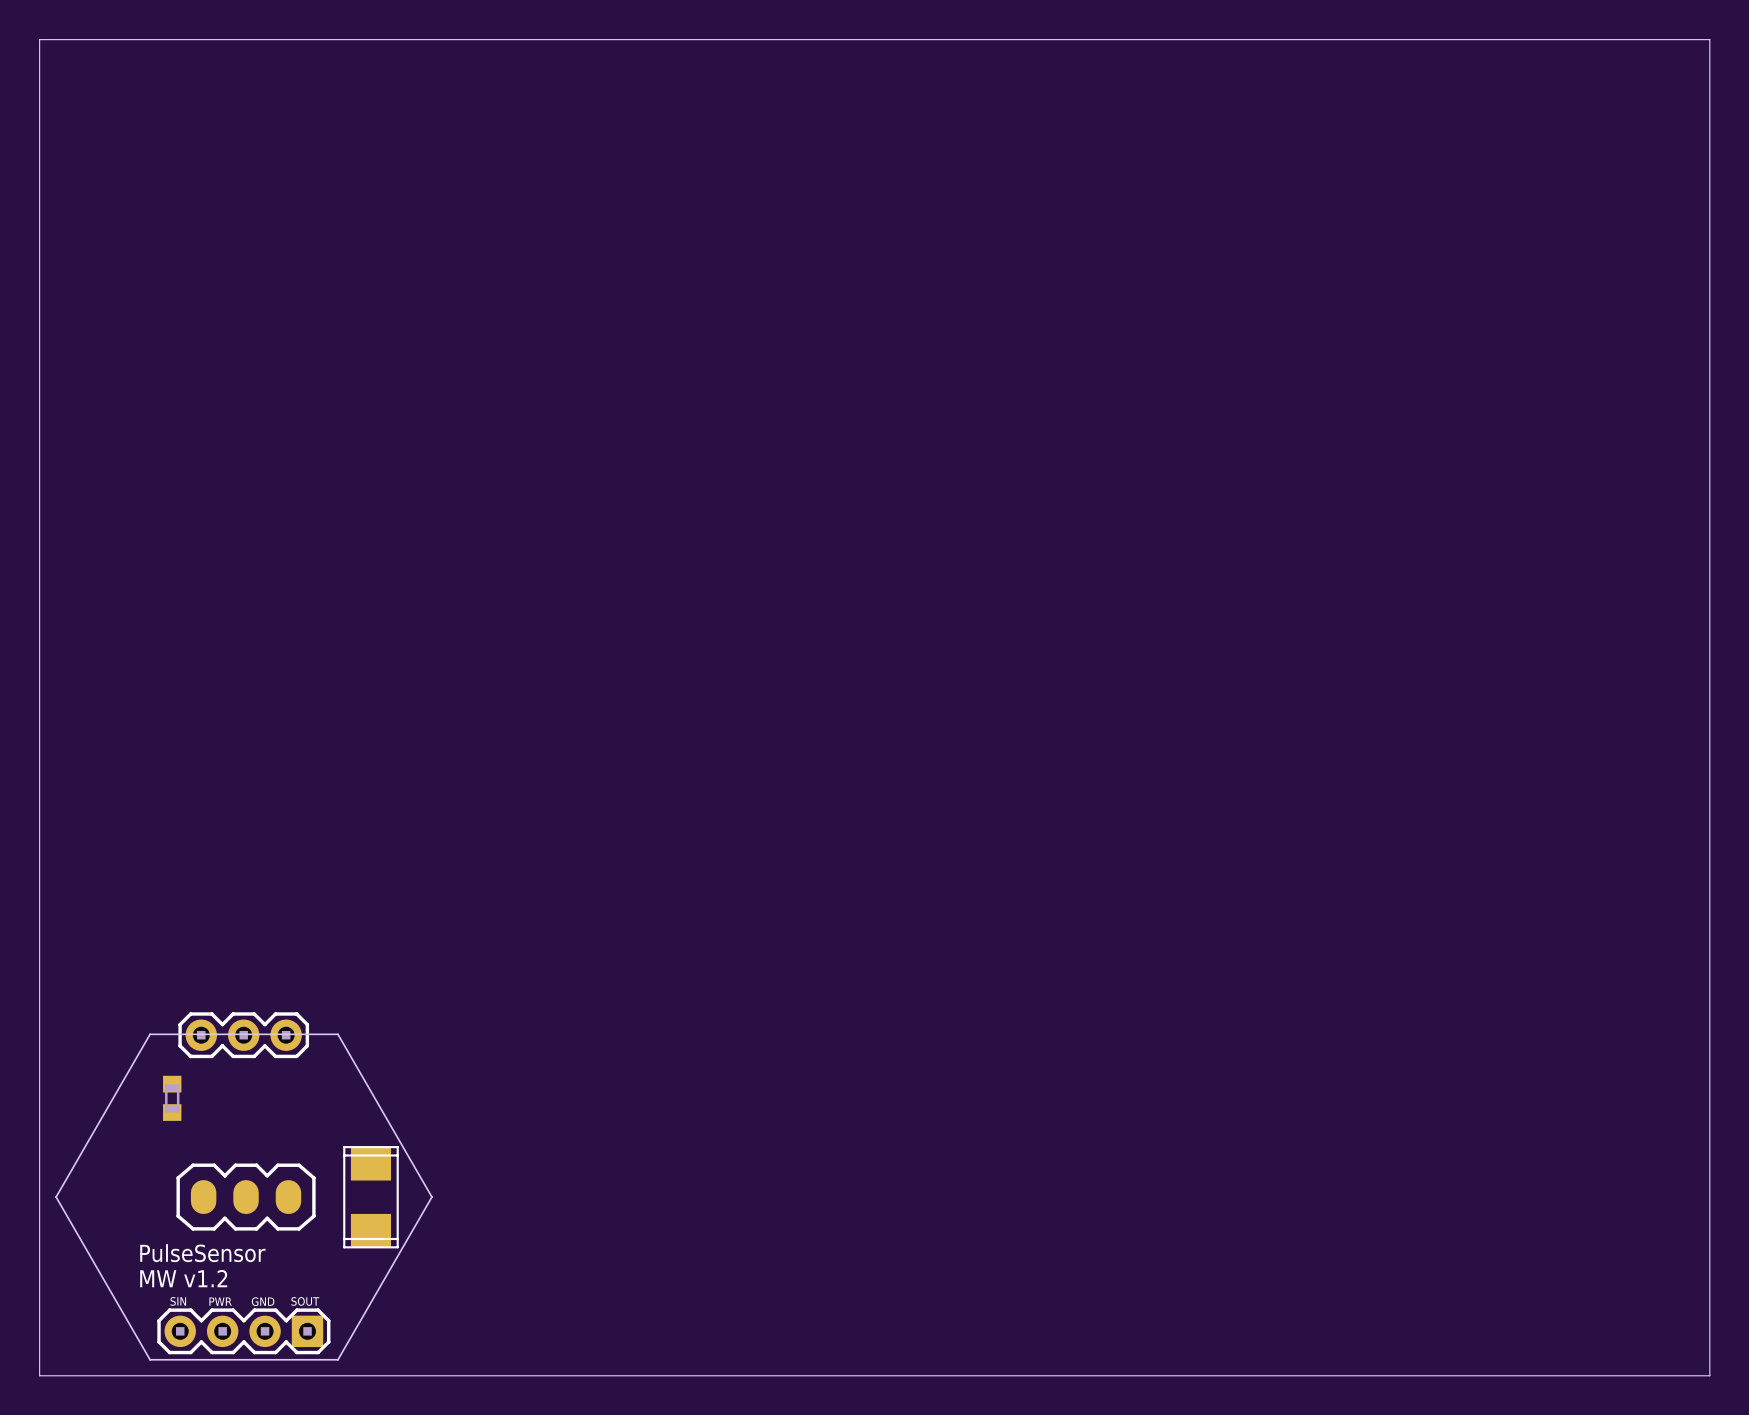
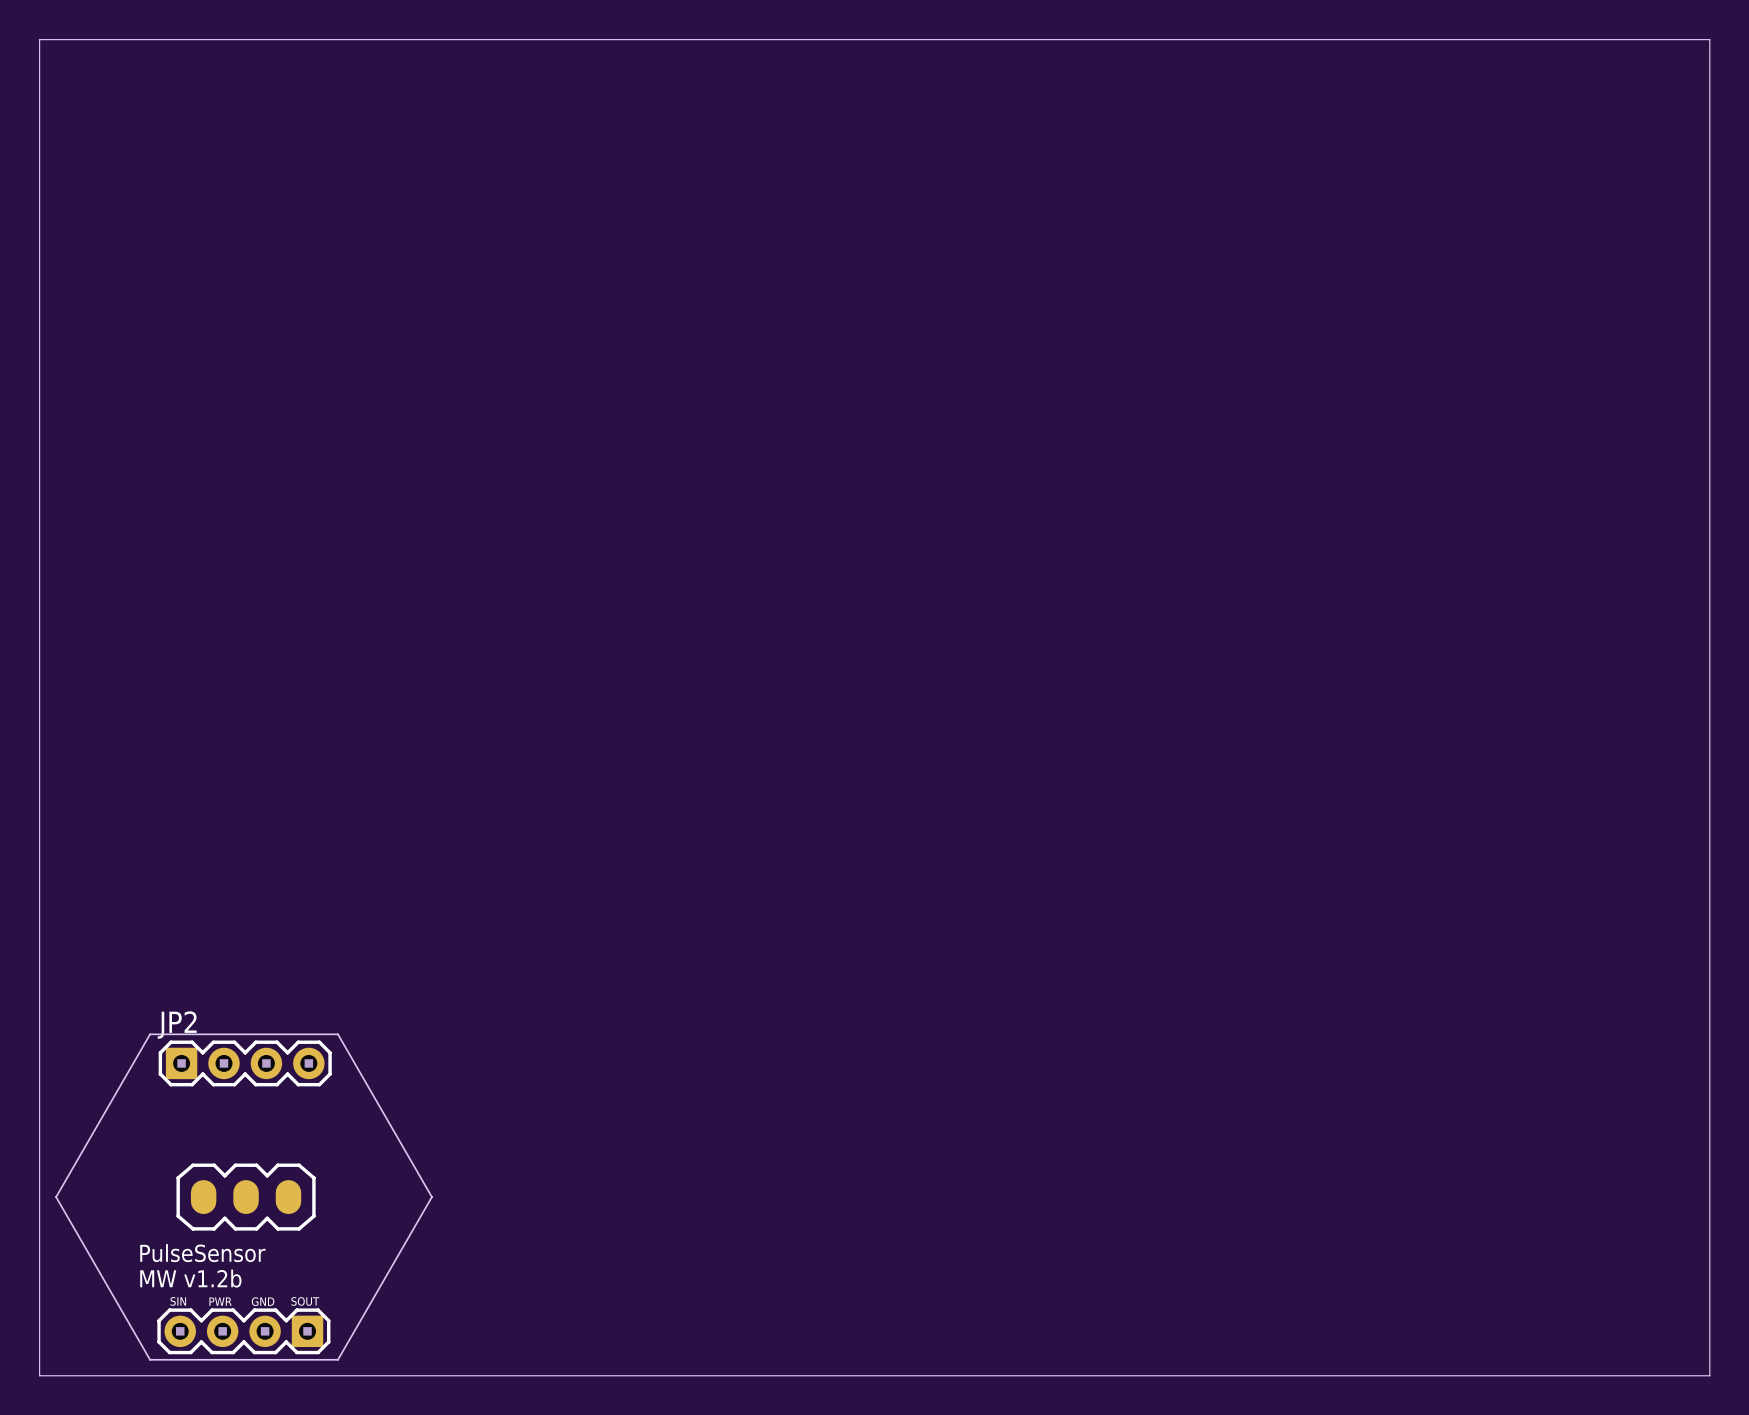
part: (243, 1035) -> none
JP2: none -> (245, 1063)
part: (172, 1098) -> none
part: (370, 1197) -> none
text: MW v1.2 (183, 1278) -> MW v1.2b (190, 1278)

